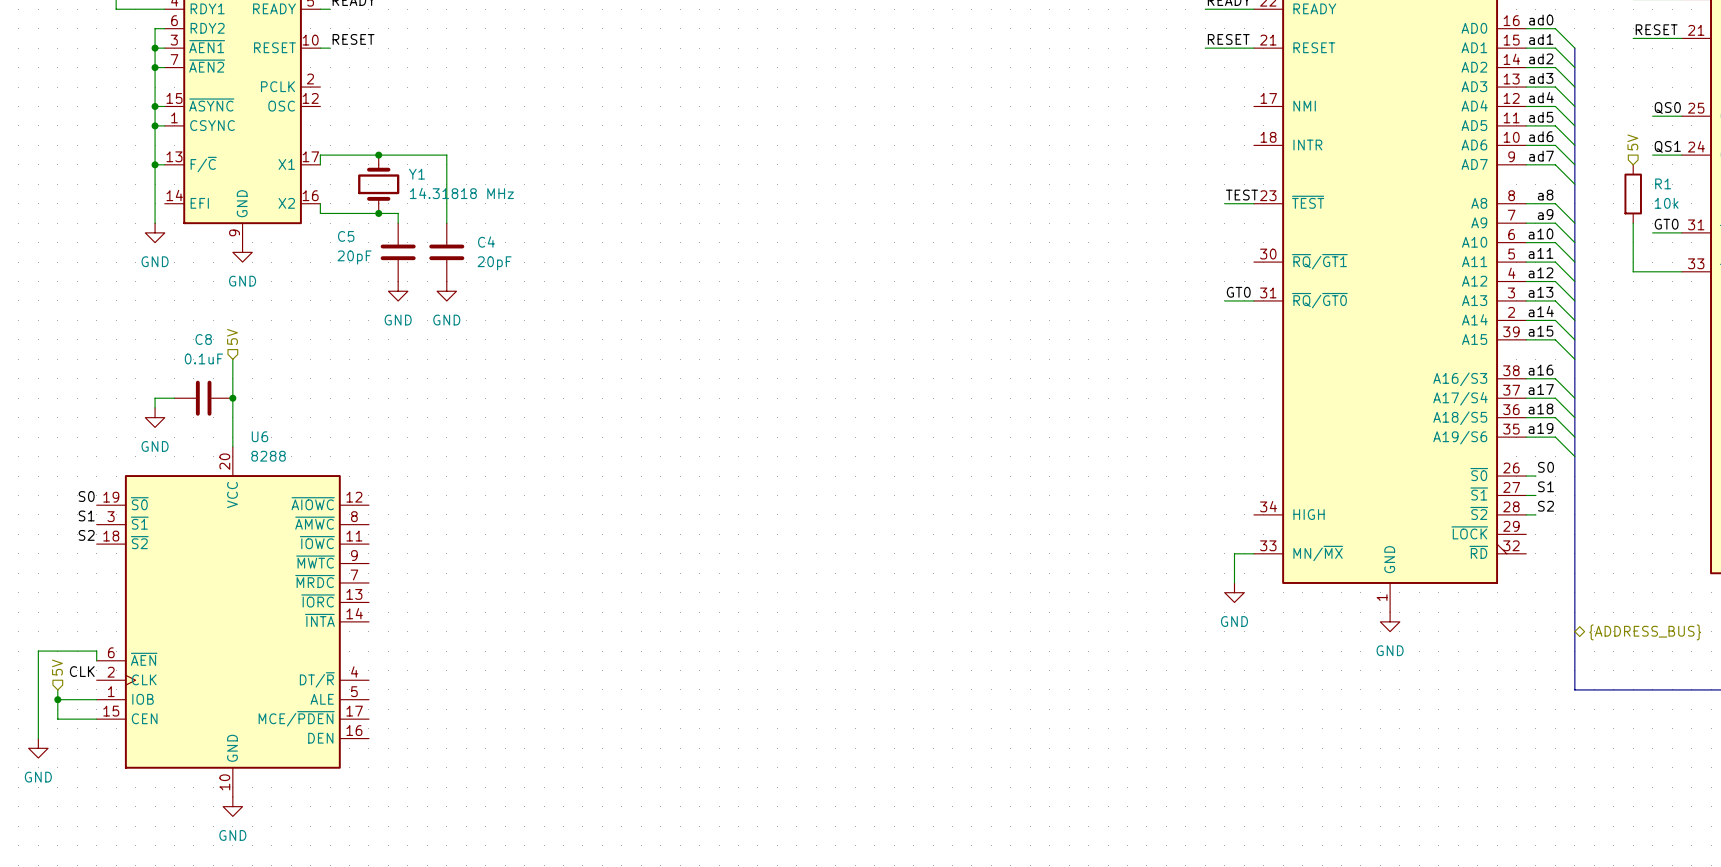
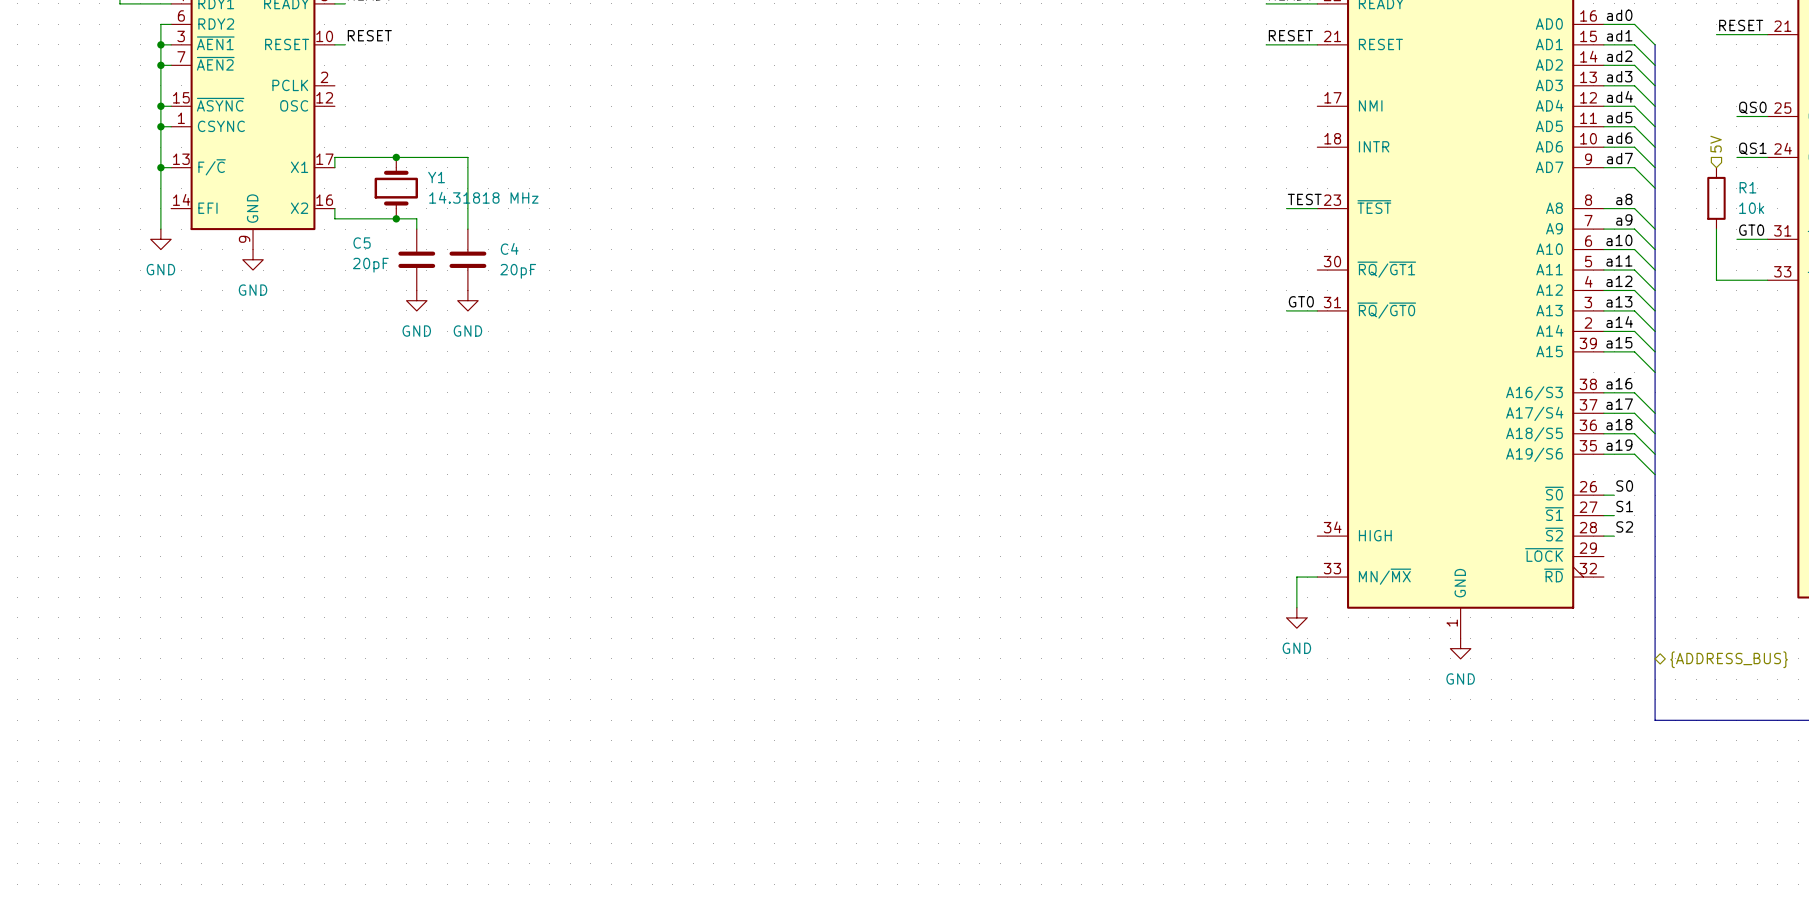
hierarchical label: 5V (232, 336) -> none
wire: (232, 359) (232, 446) -> none
wire: (174, 398) (155, 398) (155, 407) -> none
C8: 0.1uF (203, 398) -> none
junction: (232, 398) -> none
power symbol: GND (155, 417) -> none
label: S0 (86, 496) -> none
label: S1 (86, 515) -> none
label: S2 (86, 535) -> none
U6: 8288 (232, 621) -> none
wire: (96, 660) (96, 651) (38, 651) (38, 738) -> none
hierarchical label: 5V (57, 667) -> none
label: CLK (82, 671) -> none
wire: (57, 689) (57, 719) (96, 719) -> none
wire: (57, 699) (96, 699) -> none
junction: (57, 699) -> none
power symbol: GND (38, 748) -> none
power symbol: GND (232, 806) -> none

